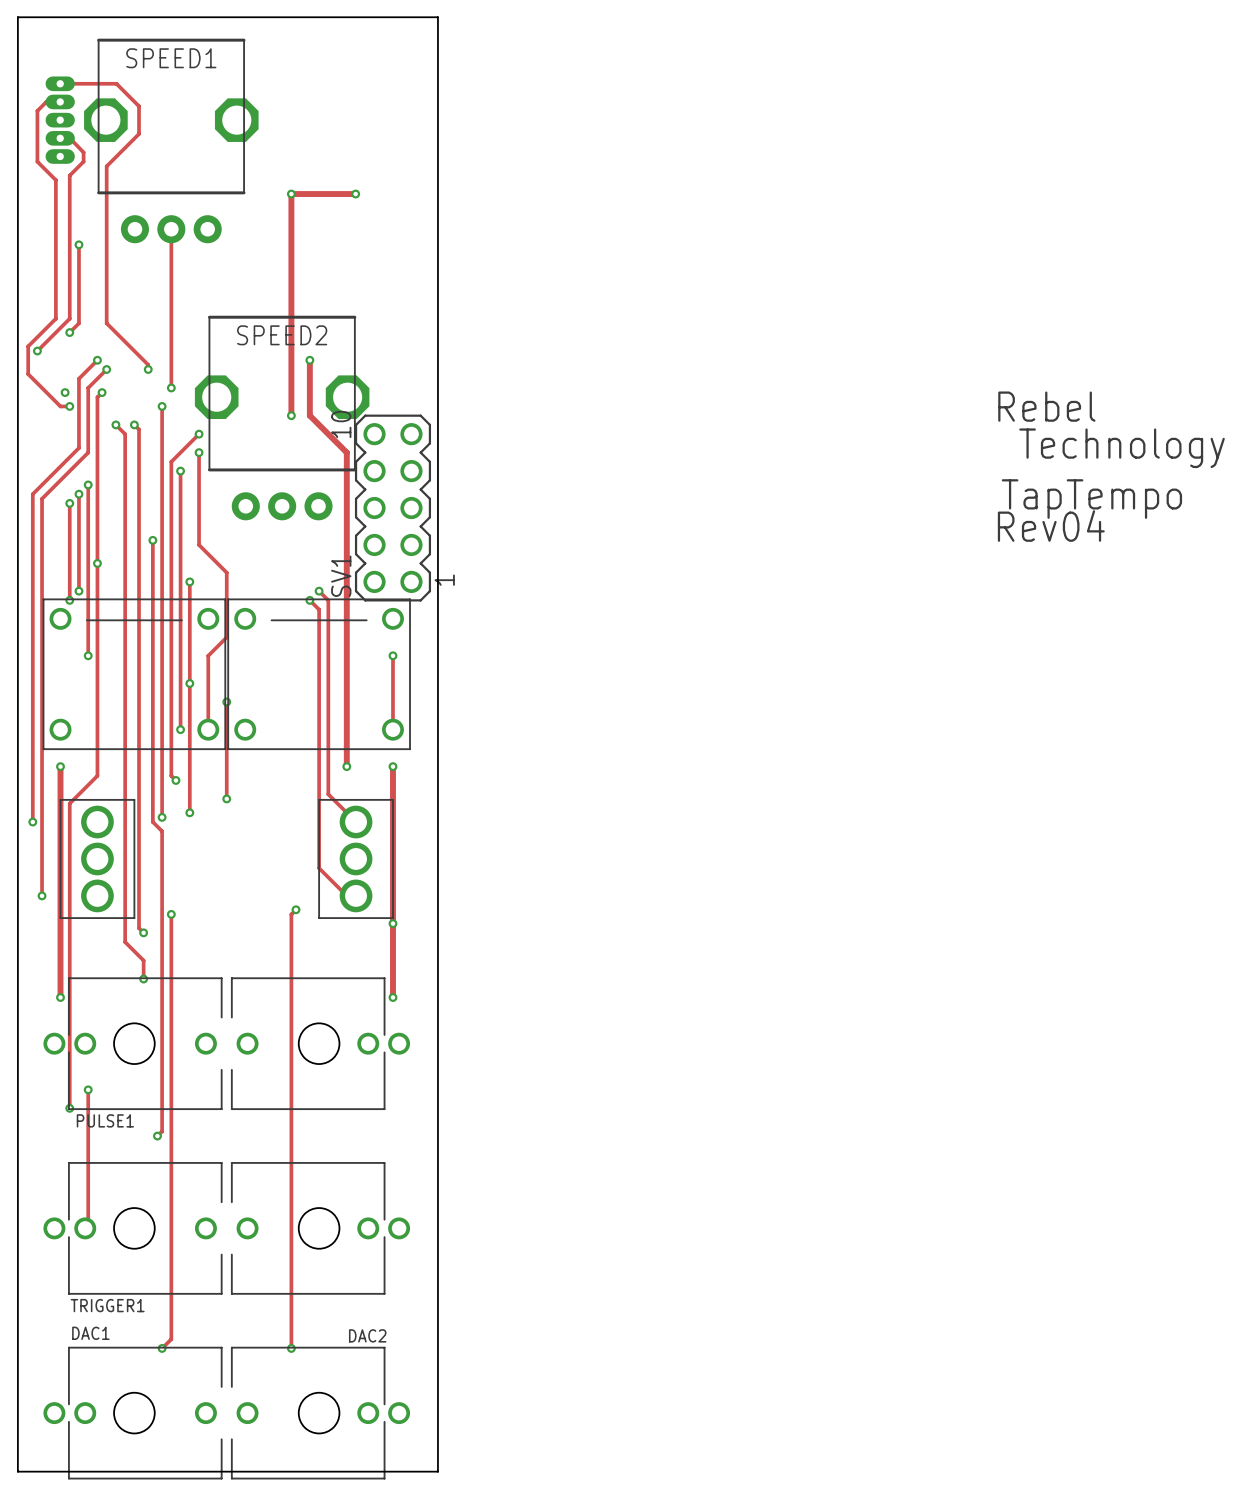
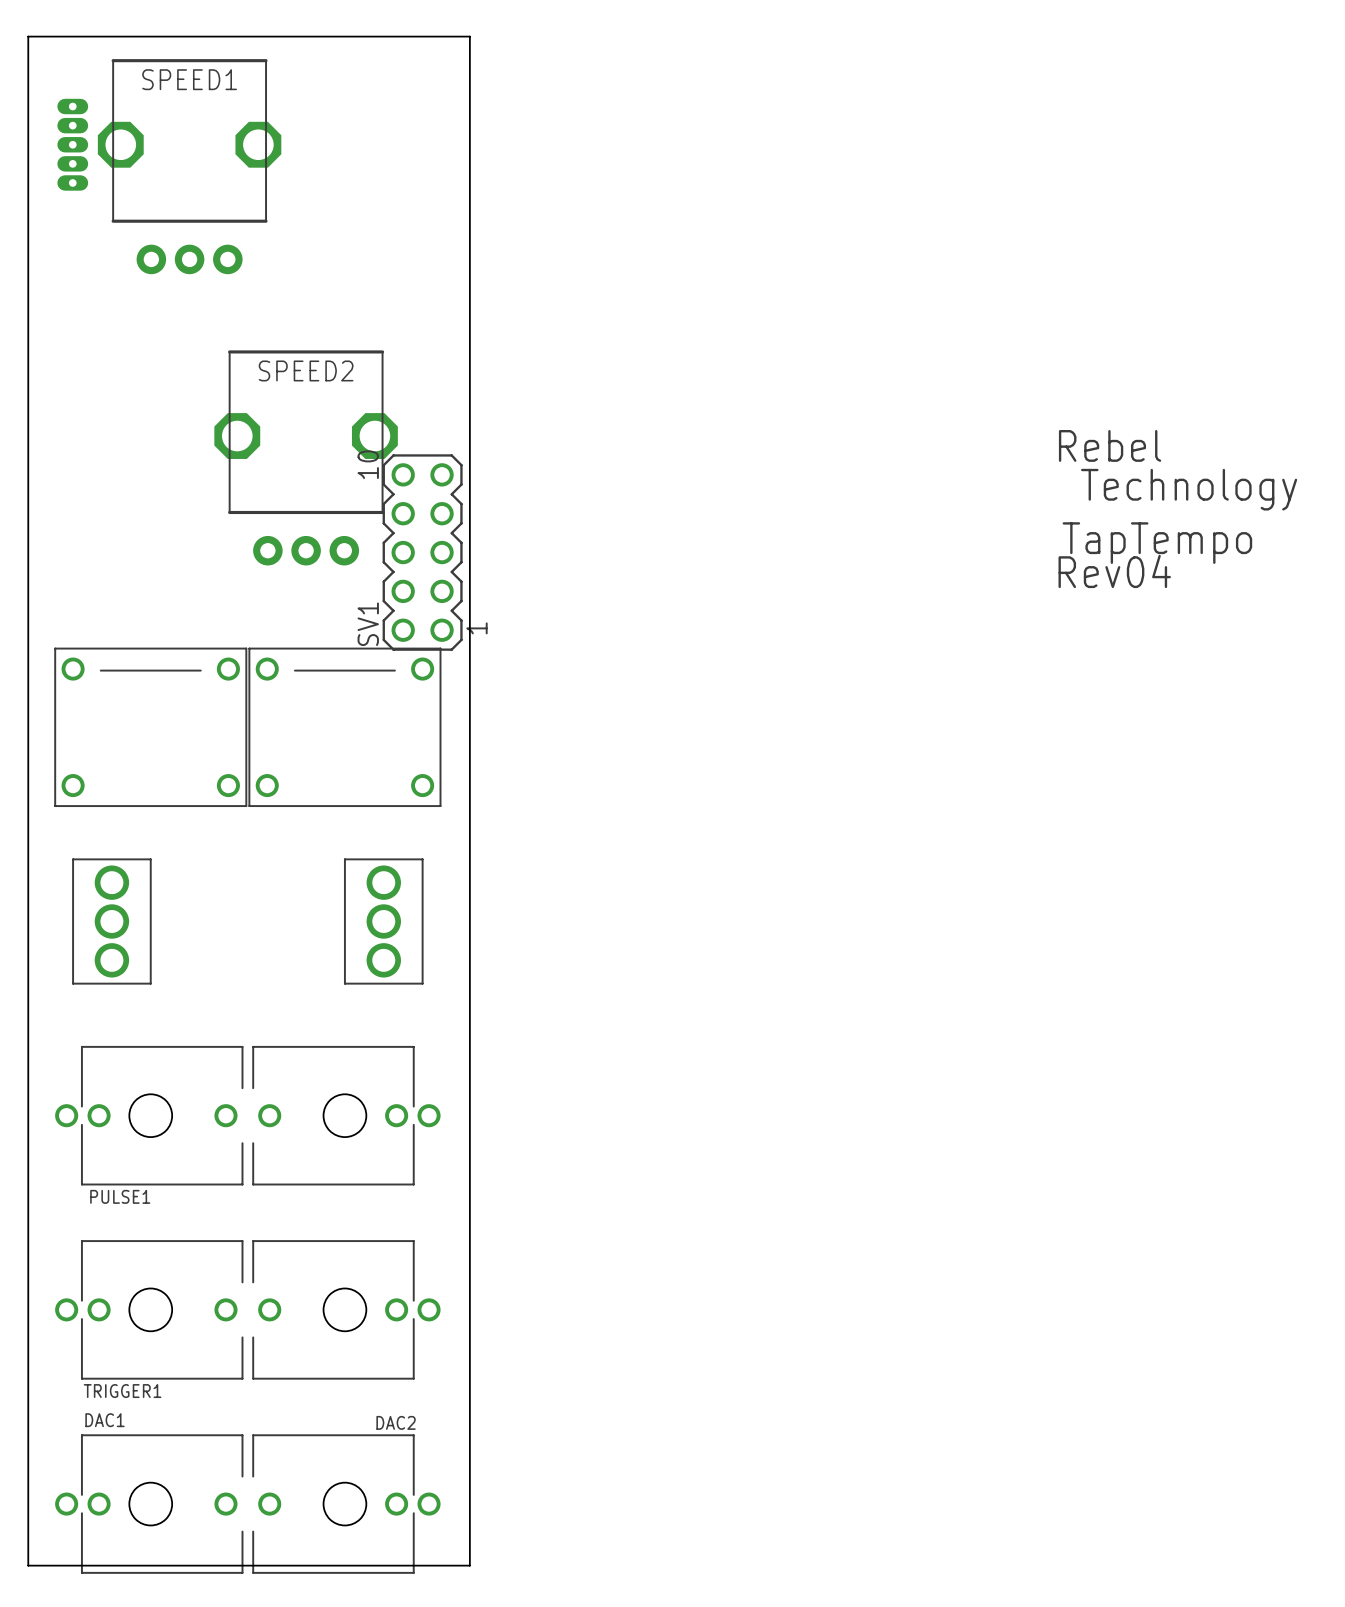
track: (60, 83) (116, 83) (139, 106) (139, 134) (106, 166) (106, 323) (148, 364) (148, 369) -> none
track: (60, 101) (46, 101) (37, 110) (37, 161) (55, 180) (55, 318) (28, 346) (28, 374) (60, 406) (69, 406) -> none
track: (60, 138) (70, 138) (83, 152) (83, 161) (69, 175) (69, 318) (37, 351) -> none
via: (291, 194) -> none
track: (355, 194) (291, 194) (291, 415) -> none
via: (355, 194) -> none
track: (171, 229) (171, 387) -> none
track: (78, 244) (78, 323) (69, 332) -> none
via: (78, 244) -> none
via: (69, 332) -> none
via: (37, 351) -> none
track: (97, 360) (78, 378) (78, 448) (32, 494) (32, 822) -> none
via: (97, 360) -> none
track: (309, 360) (309, 415) (346, 452) (346, 766) -> none
via: (309, 360) -> none
track: (106, 369) (88, 387) (88, 452) (42, 498) (42, 895) -> none
via: (106, 369) -> none
via: (148, 369) -> none
via: (171, 387) -> none
via: (65, 392) -> none
track: (102, 392) (97, 397) (97, 775) (69, 803) (69, 1108) -> none
via: (102, 392) -> none
via: (69, 406) -> none
track: (162, 406) (162, 817) -> none
via: (162, 406) -> none
via: (291, 415) -> none
track: (115, 424) (125, 434) (125, 942) (143, 960) (143, 979) -> none
via: (115, 424) -> none
track: (134, 424) (139, 429) (139, 928) (143, 932) -> none
via: (134, 424) -> none
track: (199, 434) (171, 461) (171, 775) (175, 780) -> none
via: (199, 434) -> none
track: (199, 452) (199, 544) (226, 572) (226, 637) (208, 655) (208, 729) -> none
via: (199, 452) -> none
track: (180, 471) (180, 729) -> none
via: (180, 471) -> none
track: (88, 484) (88, 655) -> none
via: (88, 484) -> none
track: (78, 494) (78, 591) -> none
via: (78, 494) -> none
track: (69, 503) (69, 600) -> none
via: (69, 503) -> none
track: (152, 540) (152, 822) (162, 831) (162, 1131) (157, 1136) -> none
via: (152, 540) -> none
via: (97, 563) -> none
track: (189, 581) (189, 812) -> none
via: (189, 581) -> none
via: (78, 591) -> none
track: (319, 591) (328, 600) (328, 794) (356, 822) -> none
via: (319, 591) -> none
via: (69, 600) -> none
track: (309, 600) (319, 609) (319, 868) (346, 895) (356, 895) -> none
via: (309, 600) -> none
via: (88, 655) -> none
track: (392, 655) (392, 729) -> none
via: (392, 655) -> none
via: (189, 683) -> none
track: (226, 701) (226, 798) -> none
via: (226, 701) -> none
via: (180, 729) -> none
track: (60, 766) (60, 997) -> none
via: (60, 766) -> none
via: (346, 766) -> none
track: (392, 766) (392, 997) -> none
via: (392, 766) -> none
via: (175, 780) -> none
via: (226, 798) -> none
via: (189, 812) -> none
via: (162, 817) -> none
via: (32, 822) -> none
via: (42, 895) -> none
track: (296, 909) (291, 914) (291, 1348) -> none
via: (296, 909) -> none
track: (171, 914) (171, 1339) (162, 1348) -> none
via: (171, 914) -> none
via: (392, 923) -> none
via: (143, 932) -> none
via: (143, 979) -> none
via: (60, 997) -> none
via: (392, 997) -> none
track: (88, 1089) (88, 1225) (85, 1228) -> none
via: (88, 1089) -> none
via: (69, 1108) -> none
via: (157, 1136) -> none
via: (162, 1348) -> none
via: (291, 1348) -> none

